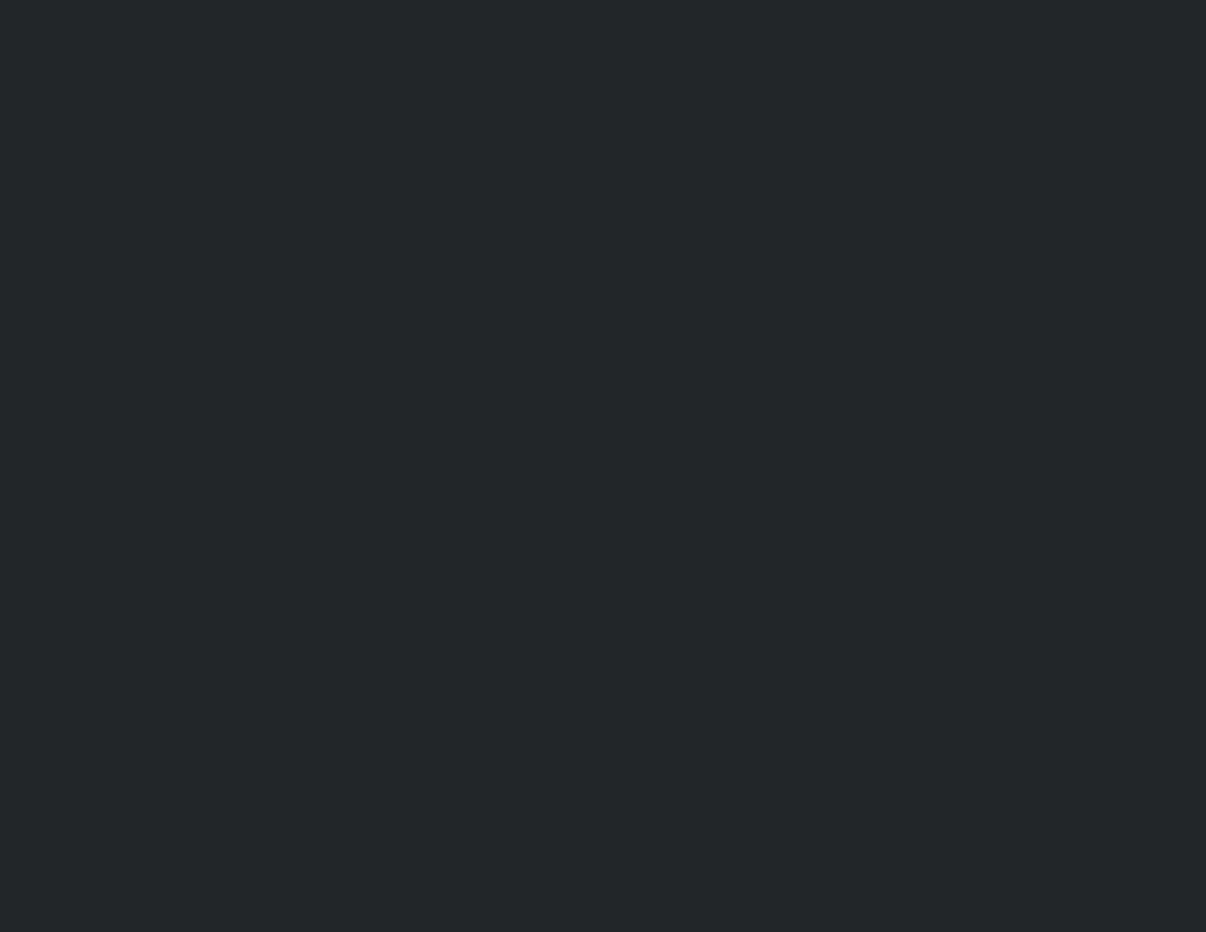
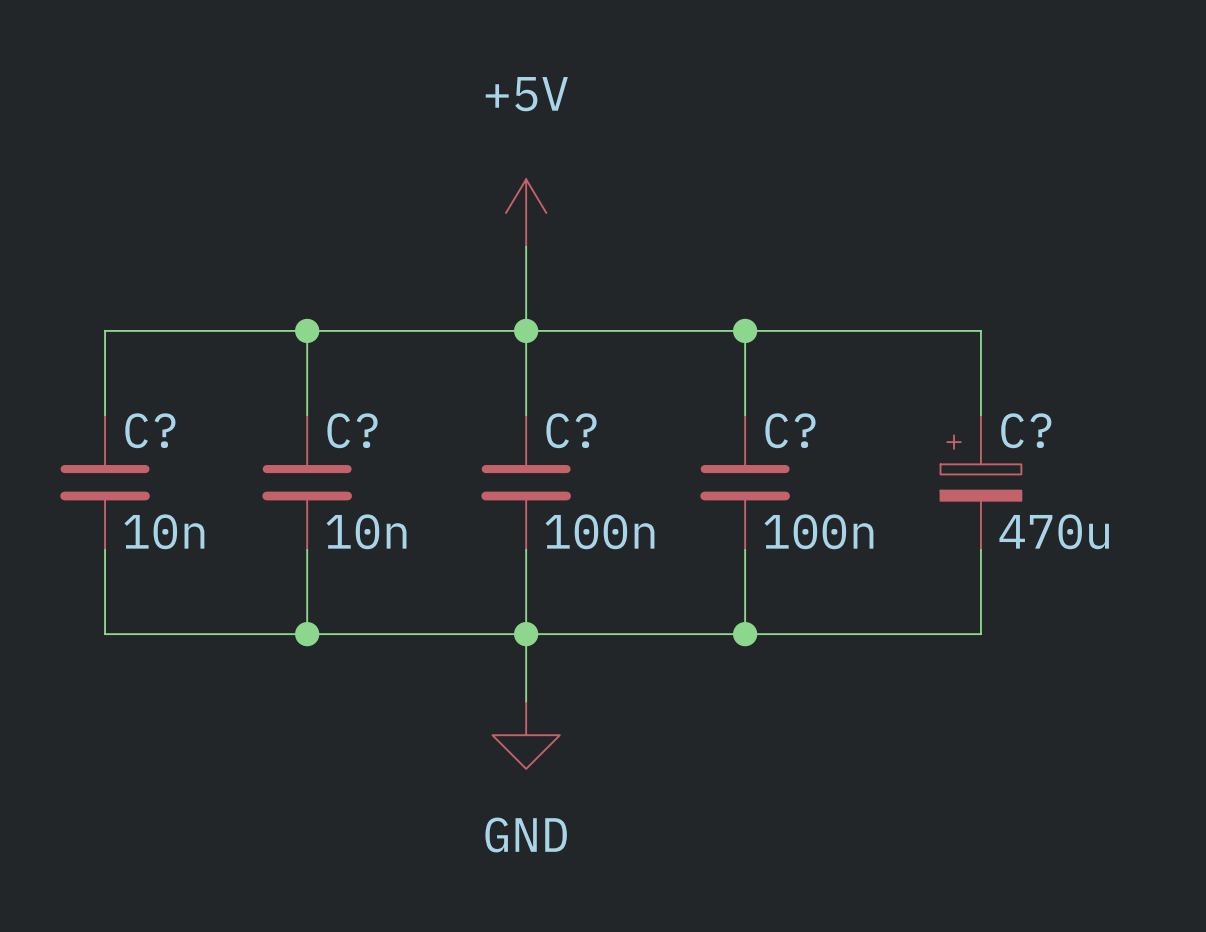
power symbol: none -> +5V (526, 213)
wire: none -> (526, 246) (526, 415)
wire: none -> (307, 330) (307, 415)
junction: none -> (307, 330)
junction: none -> (526, 330)
wire: none -> (745, 330) (745, 415)
junction: none -> (745, 330)
wire: none -> (105, 415) (105, 330) (980, 330) (980, 415)
C?: none -> 10n (105, 482)
C?: none -> 10n (307, 482)
C?: none -> 100n (526, 482)
C?: none -> 100n (745, 482)
C?: none -> 470u (980, 482)
wire: none -> (105, 549) (105, 634) (980, 634) (980, 549)
wire: none -> (307, 549) (307, 634)
wire: none -> (526, 549) (526, 701)
wire: none -> (745, 549) (745, 634)
junction: none -> (307, 634)
junction: none -> (526, 634)
junction: none -> (745, 634)
power symbol: none -> GND (526, 735)

